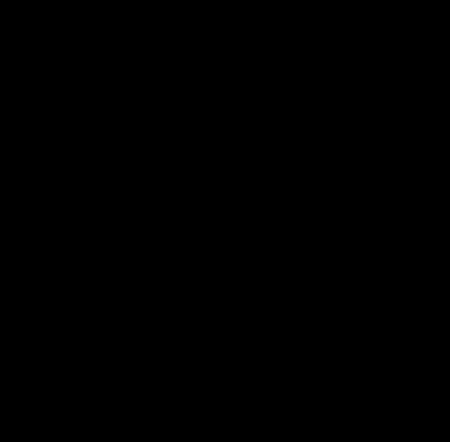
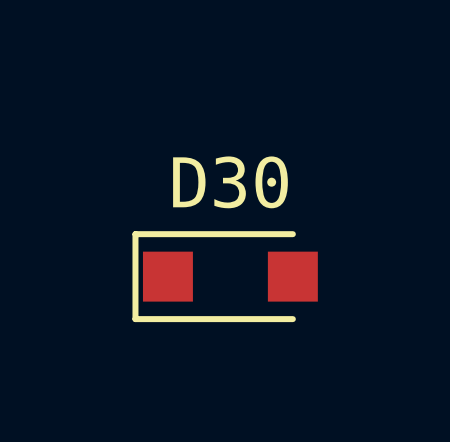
D30: none -> (225, 276)

